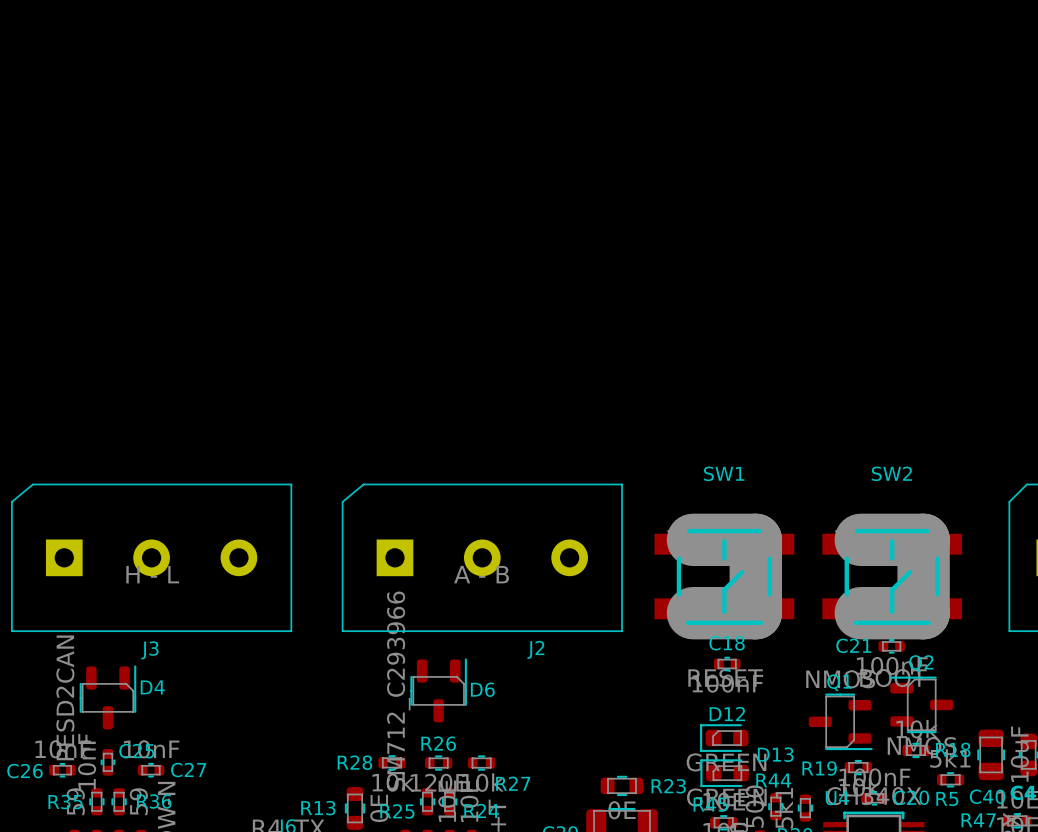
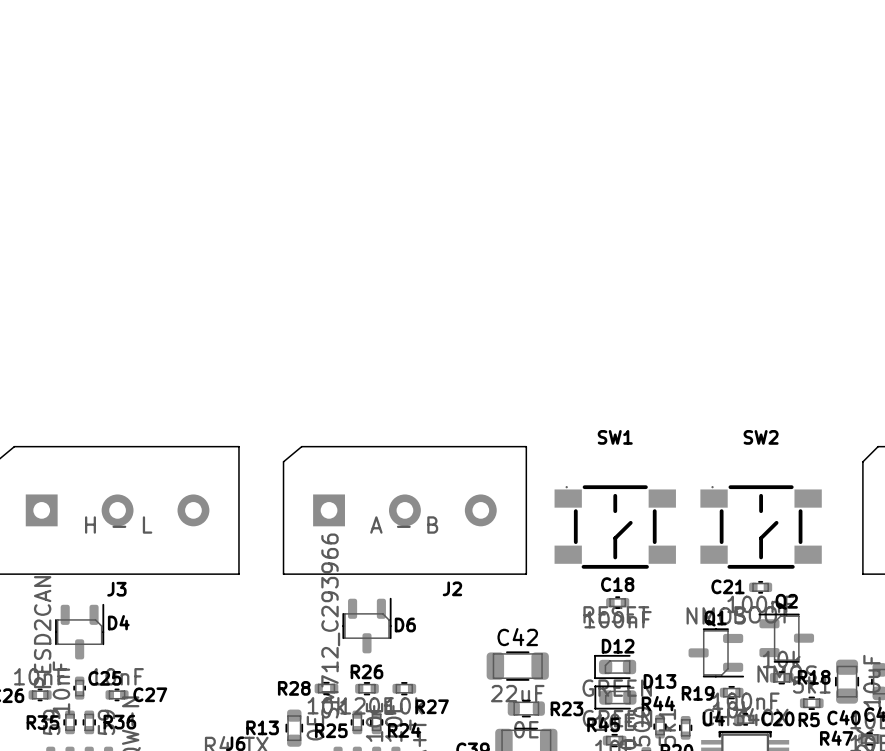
SW1 footprint: [654, 513, 795, 640] -> [554, 485, 676, 569]
SW2 footprint: [822, 513, 963, 640] -> [700, 485, 822, 569]
C42: none -> 22uF (517, 666)

